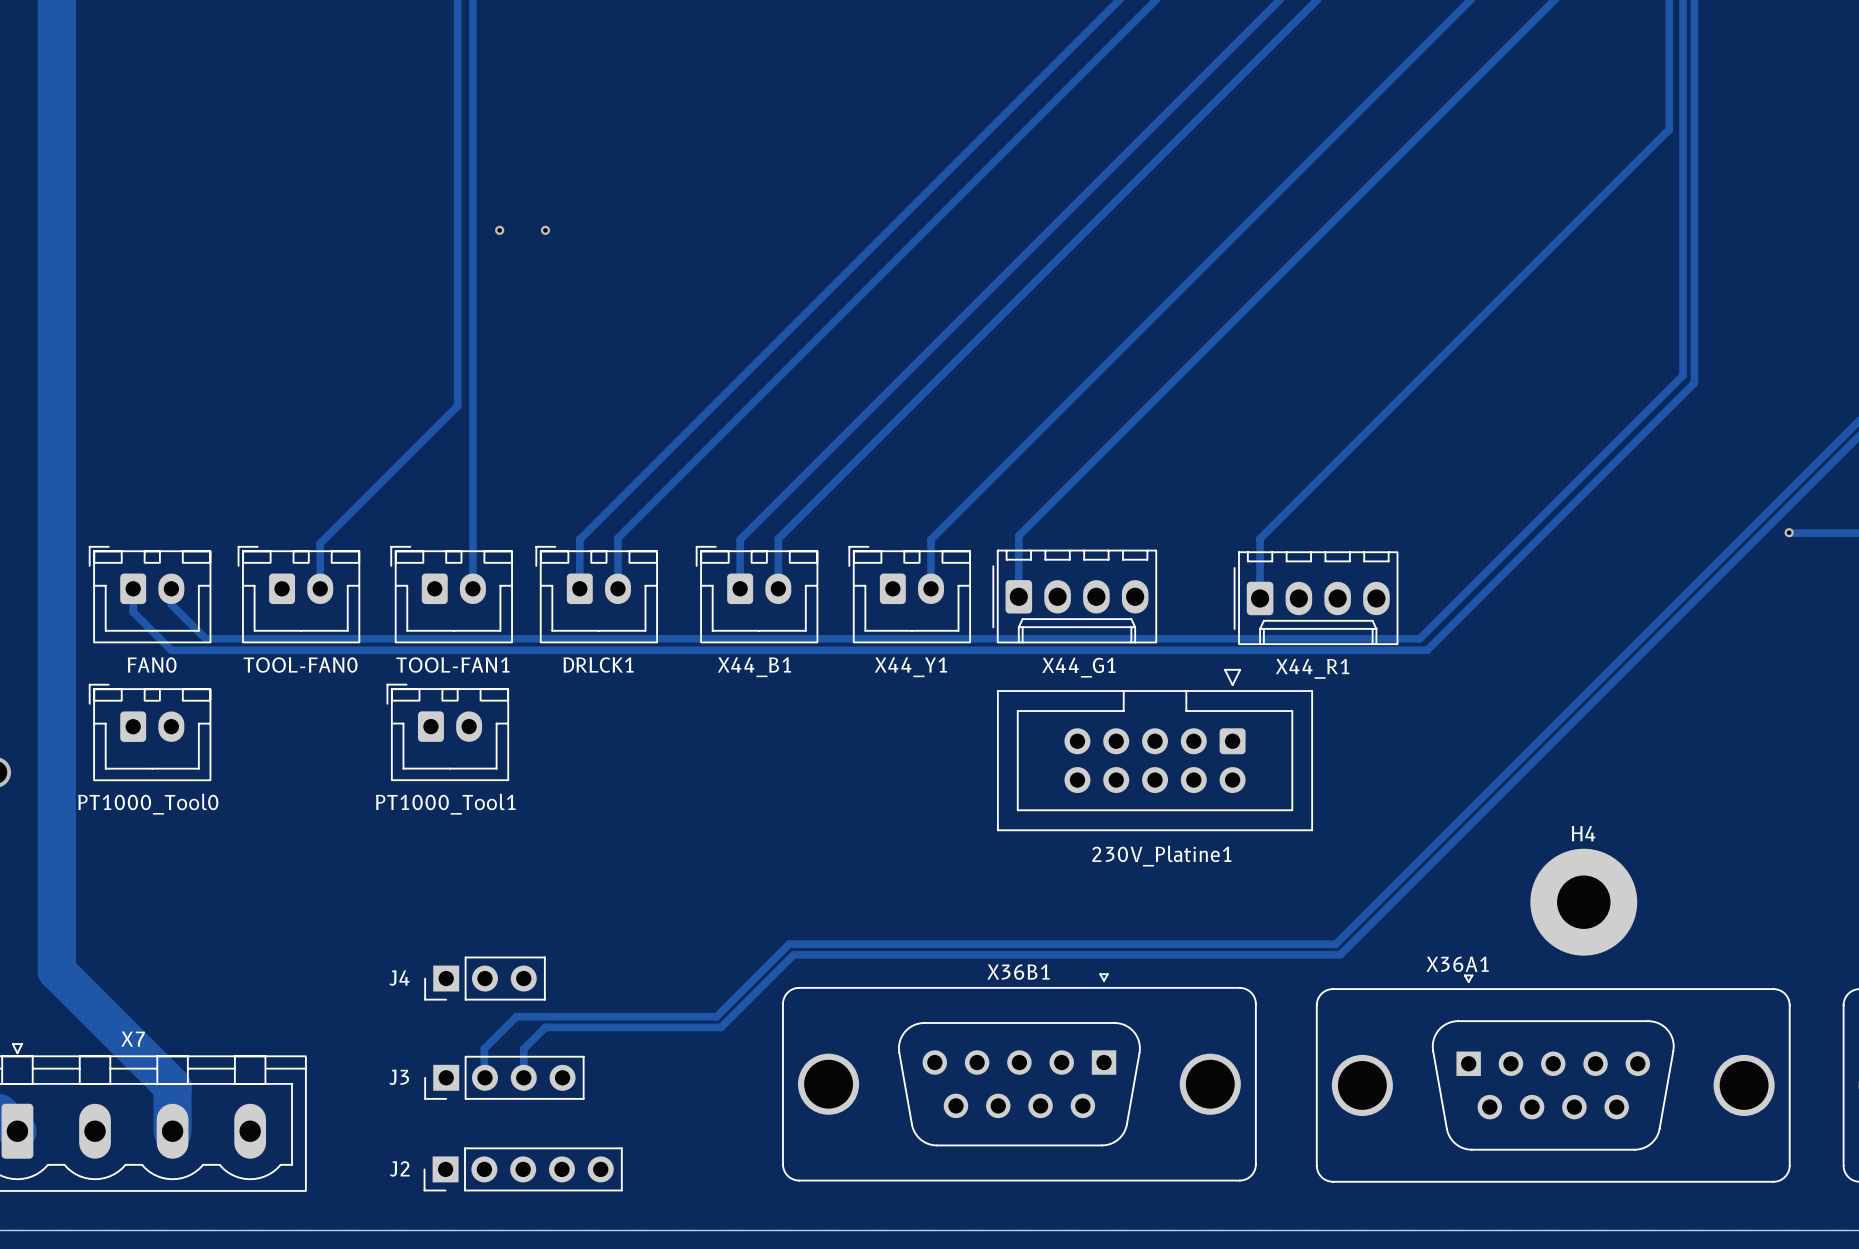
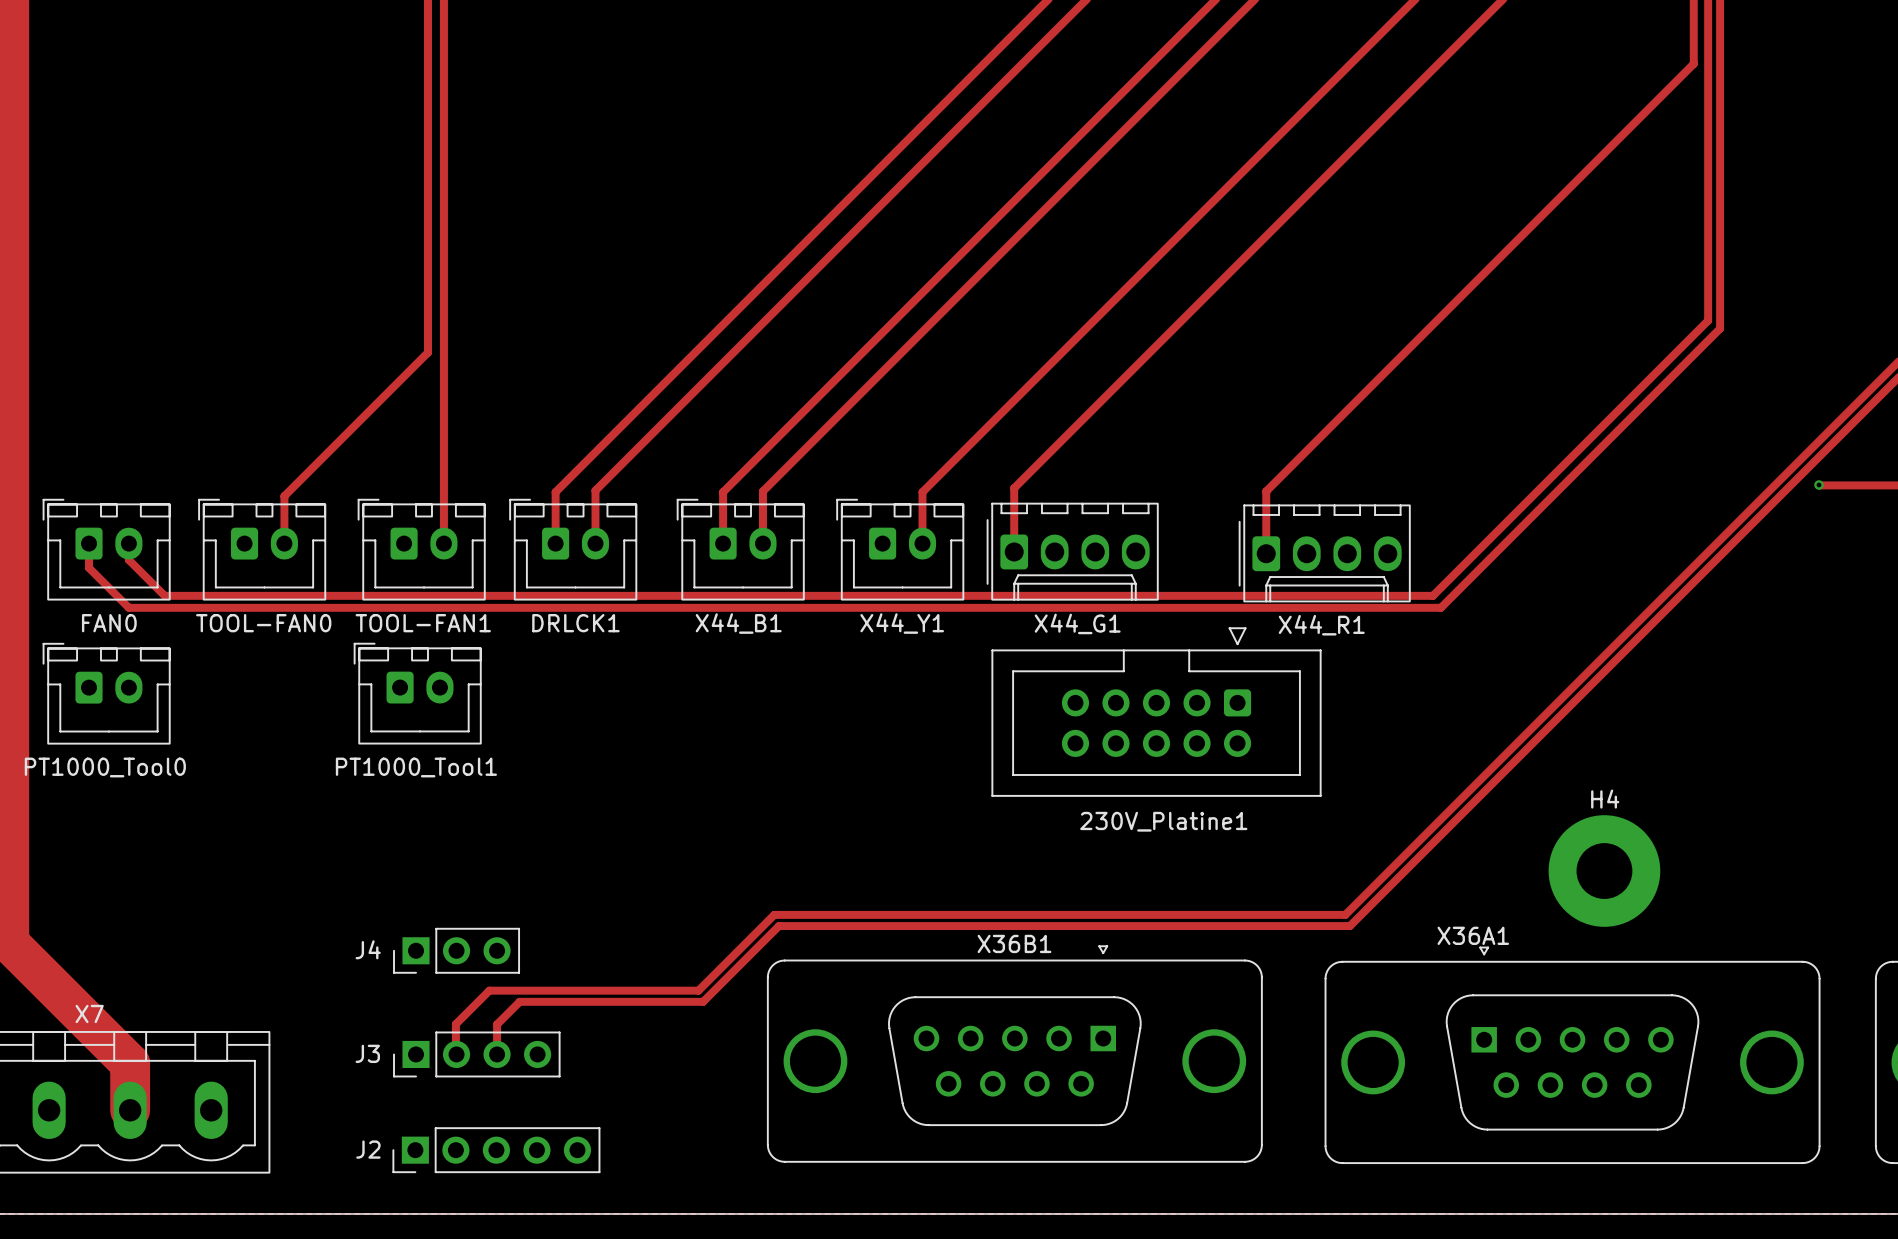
via: (499, 230) -> none
via: (545, 230) -> none

